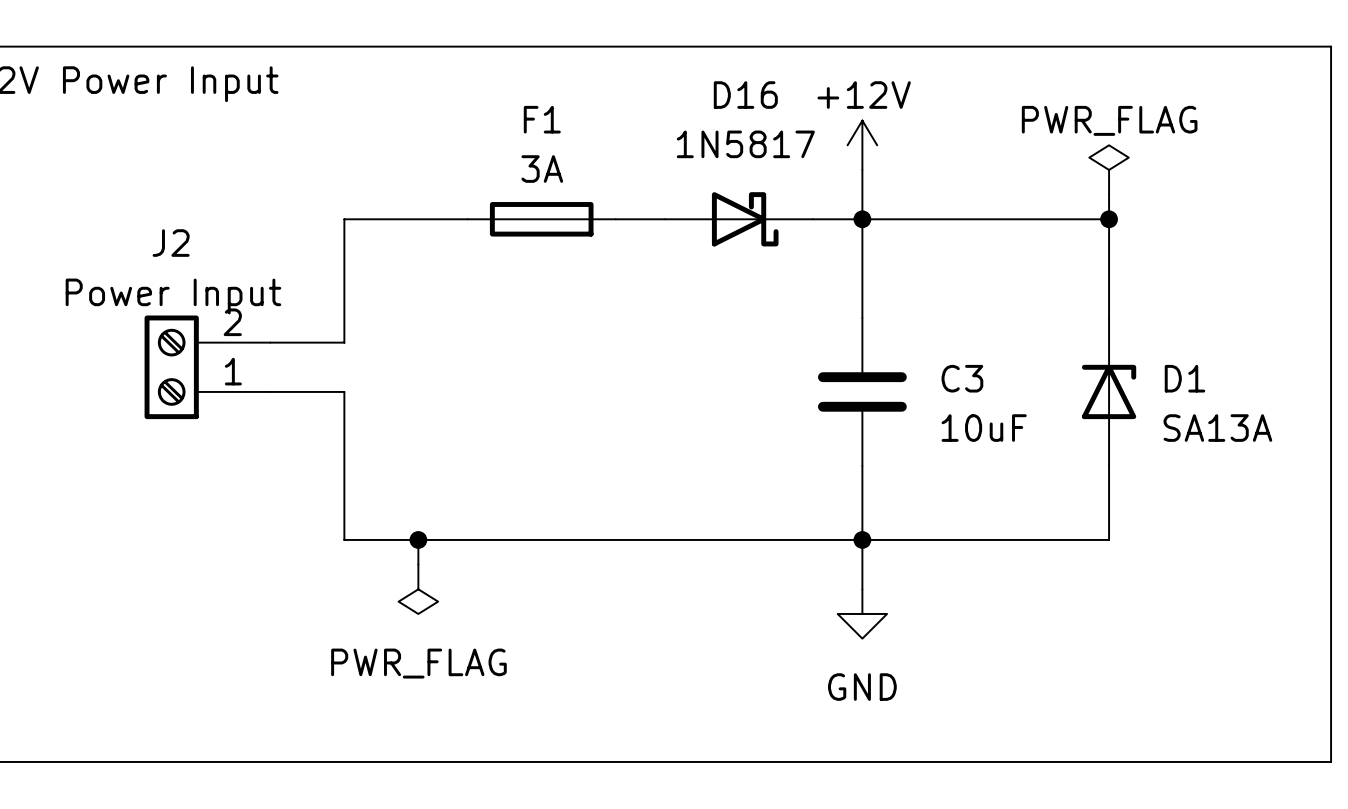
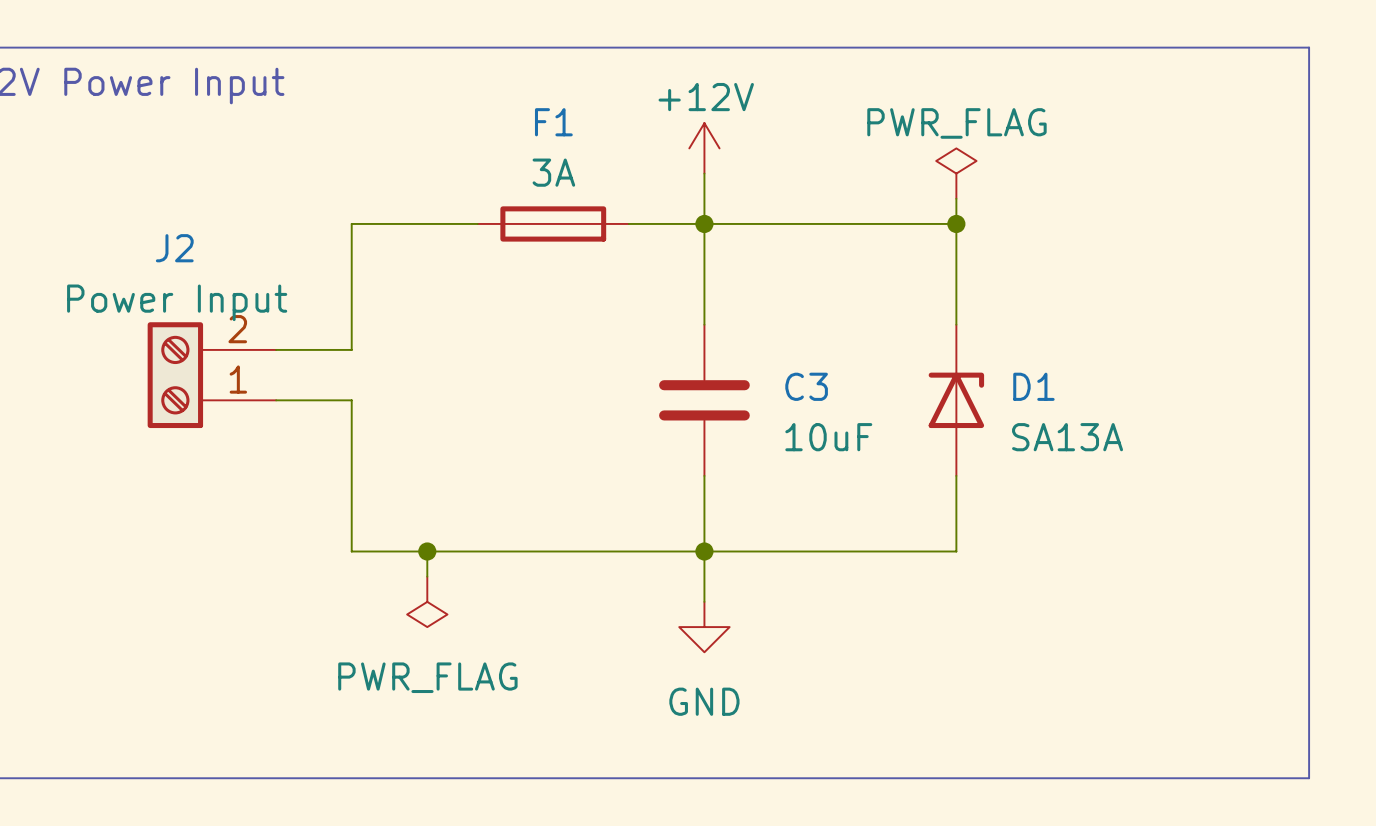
line: (1281, 46) (1331, 46) (1331, 761) (1281, 761) -> (1309, 47) (1309, 778)
power symbol position: +12V (862, 145) -> +12V (704, 148)
wire: (862, 169) (862, 317) -> (704, 173) (704, 324)
power symbol position: PWR_FLAG (1109, 169) -> PWR_FLAG (956, 173)
wire: (1109, 194) (1109, 317) -> (956, 198) (956, 324)
junction: none -> (704, 223)
D16: 1N5817 (739, 219) -> none
junction position: (862, 219) -> (956, 223)
wire: (936, 219) (1109, 219) -> none
junction: (1109, 219) -> none
C3 position: (862, 391) -> (704, 400)
D1 position: (1109, 391) -> (956, 400)
wire: (862, 465) (862, 589) -> (704, 475) (704, 601)
wire: (1109, 465) (1109, 539) (936, 539) -> (956, 475) (956, 551)
junction: none -> (704, 551)
junction: (862, 539) -> none
power symbol position: GND (862, 613) -> GND (704, 627)

